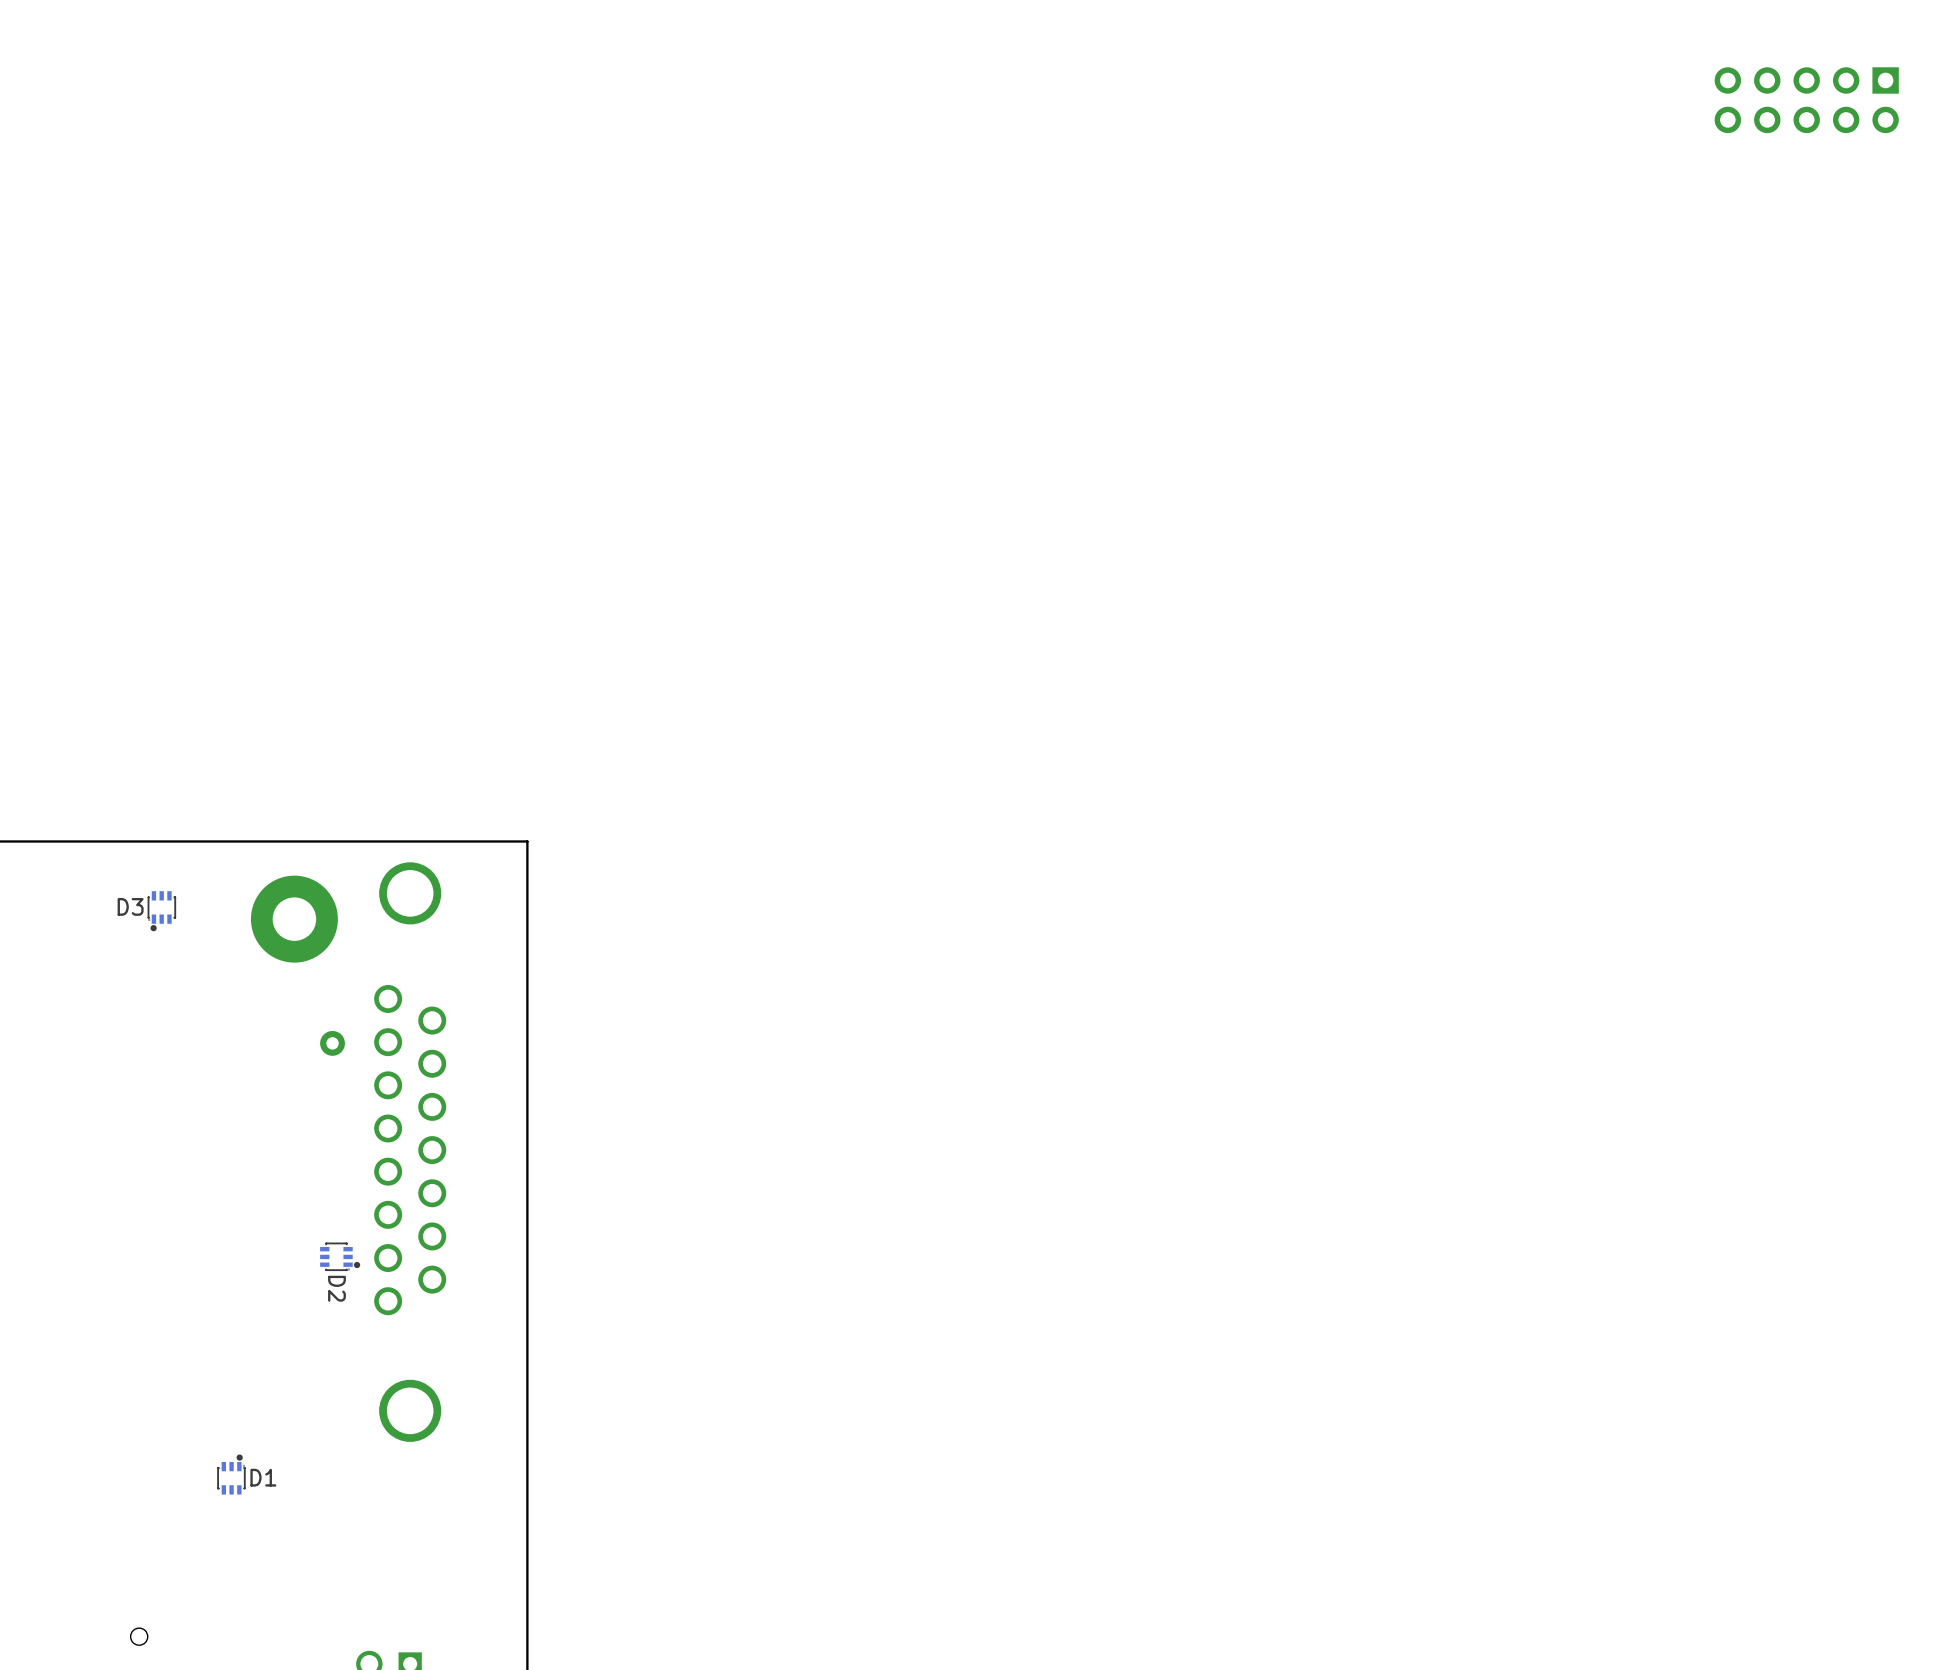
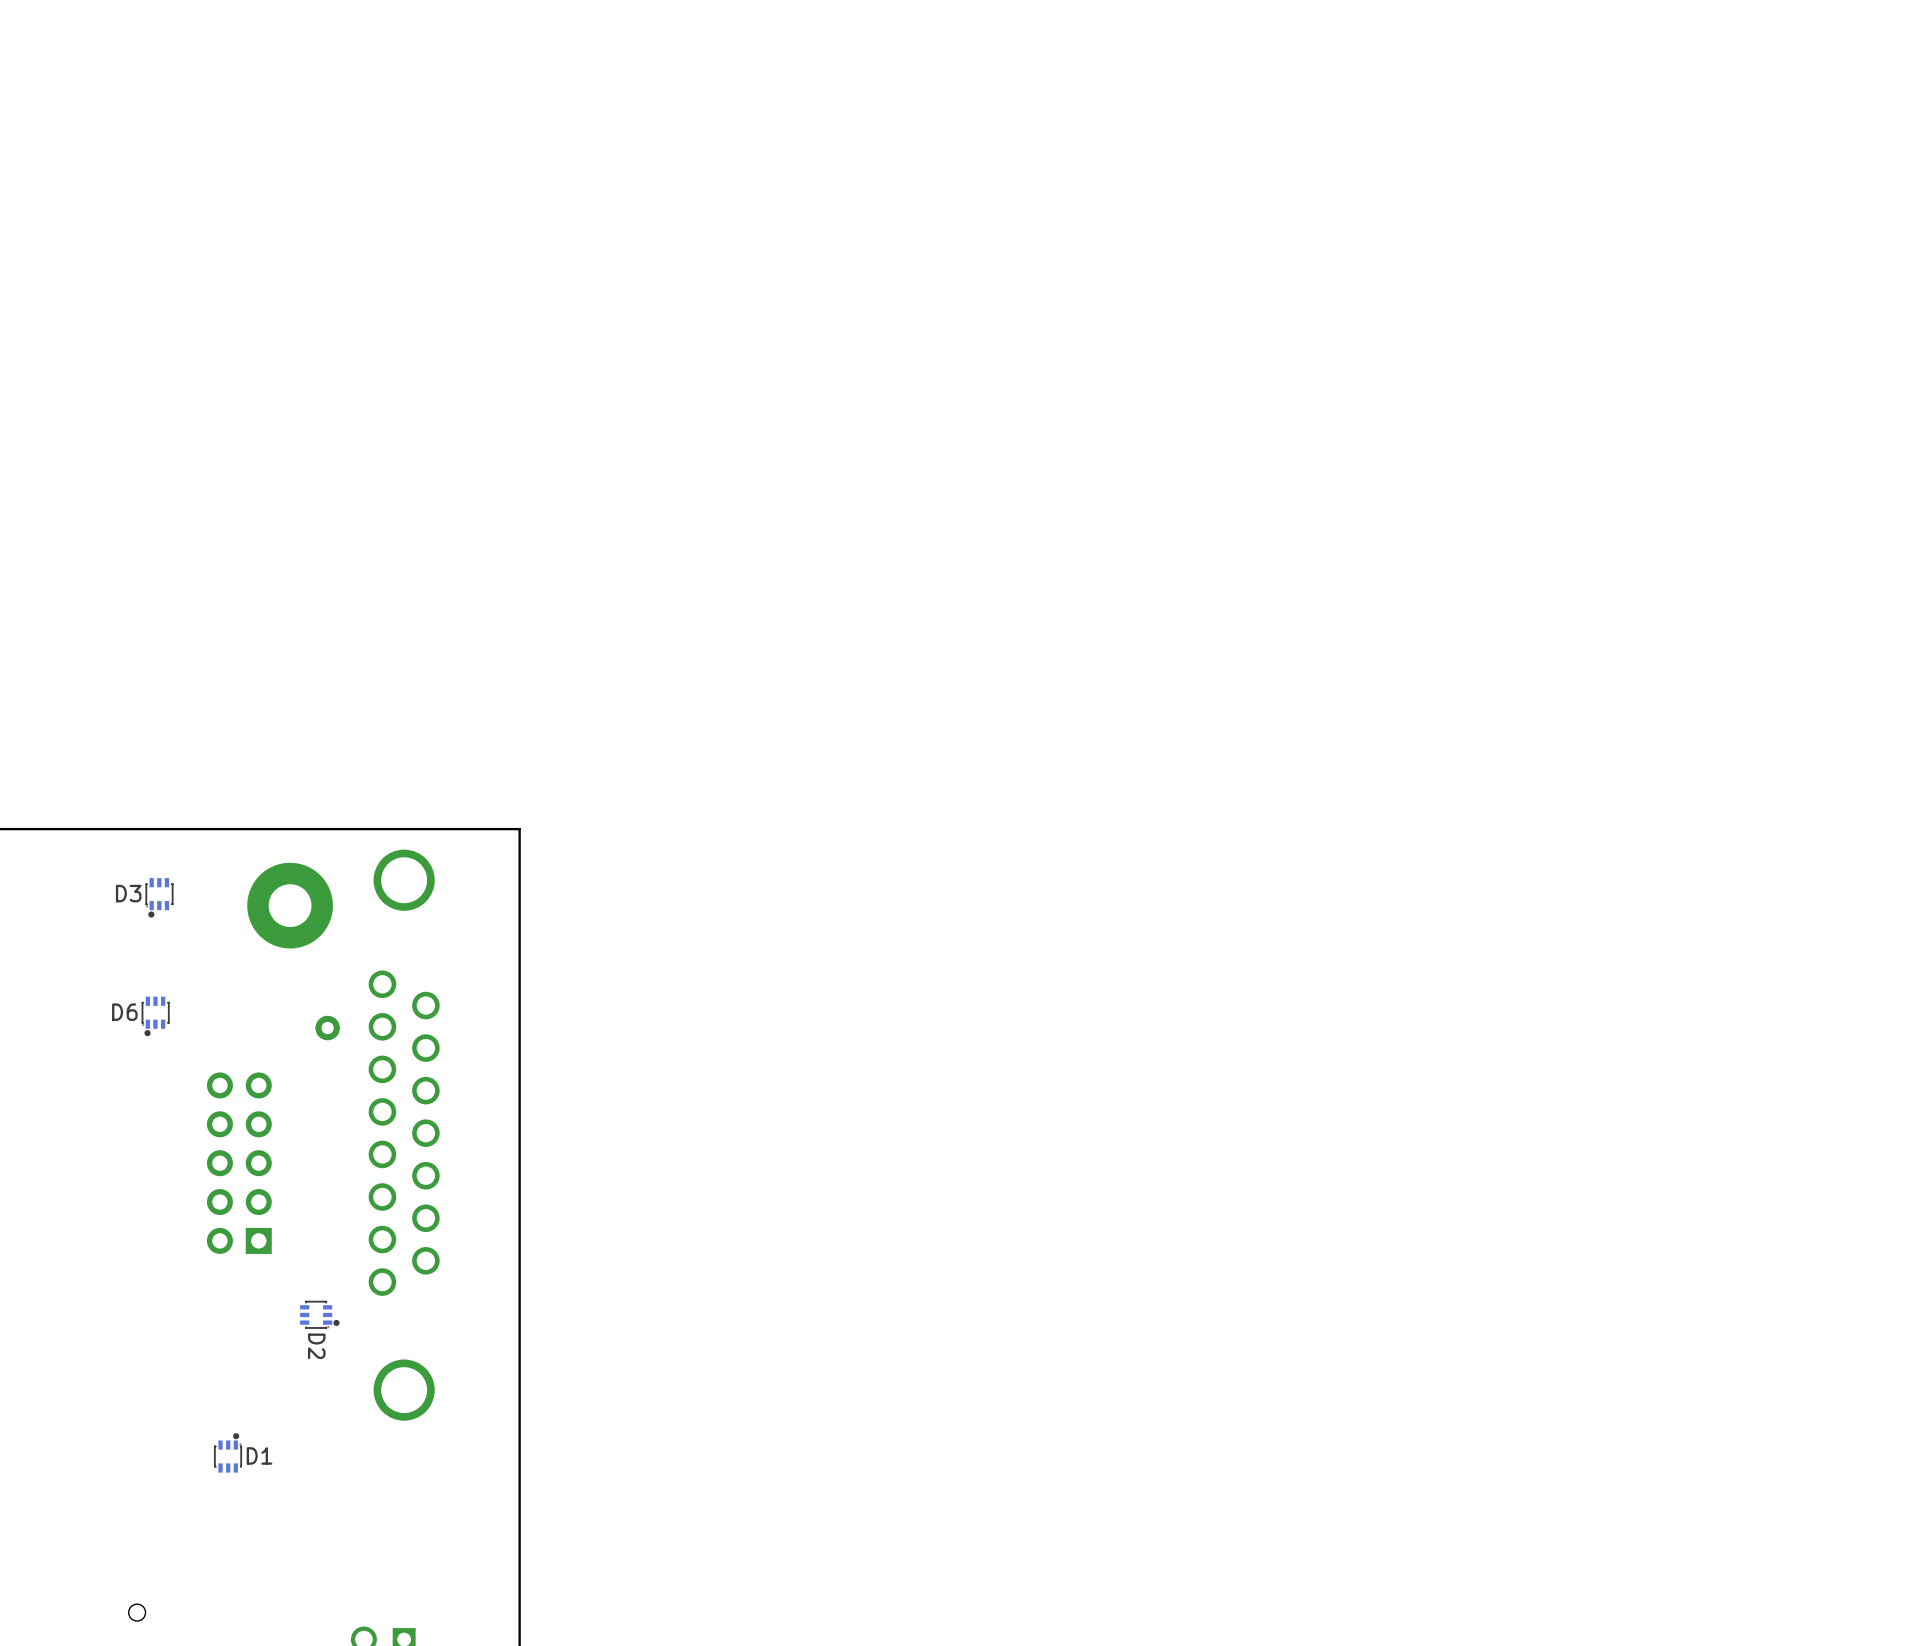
part: (1806, 100) -> none
D6: none -> (155, 1016)
part: none -> (239, 1163)
D2 position: (340, 1256) -> (319, 1314)

